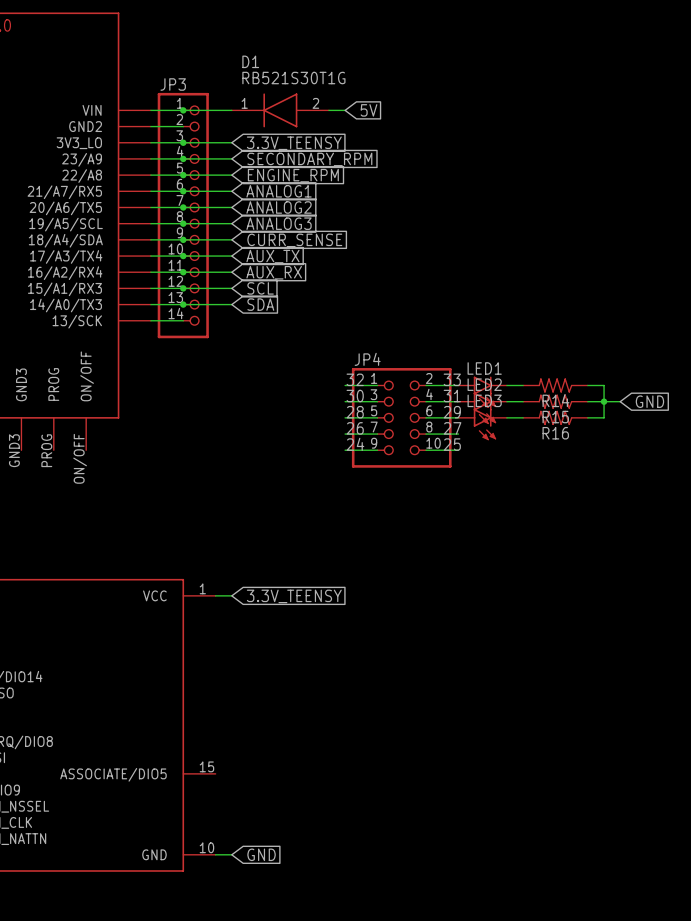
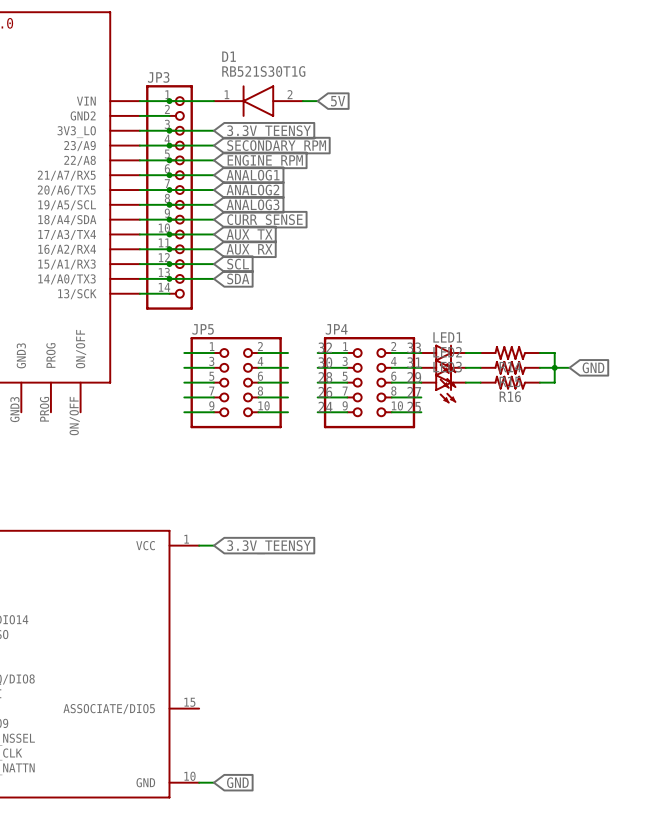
wire: none -> (184, 353) (213, 353)
wire: none -> (258, 353) (288, 353)
wire: none -> (184, 367) (213, 367)
wire: none -> (258, 367) (288, 367)
wire: none -> (184, 382) (213, 382)
JP5: none -> (236, 382)
wire: none -> (258, 382) (288, 382)
wire: none -> (184, 397) (213, 397)
wire: none -> (258, 397) (288, 397)
wire: none -> (184, 412) (213, 412)
wire: none -> (258, 412) (288, 412)

